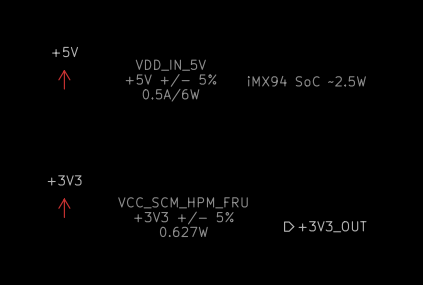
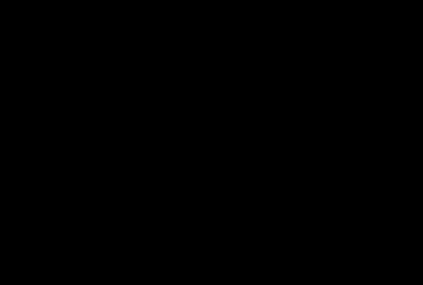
text: VDD_IN_5V (170, 65) -> none
power symbol: +5V (64, 79) -> none
text: +5V +/- 5% (171, 80) -> none
text: iMX94 SoC ~2.5W (306, 81) -> none
text: 0.5A/6W (171, 95) -> none
text: VCC_SCM_HPM_FRU (183, 202) -> none
power symbol: +3V3 (64, 208) -> none
text: +3V3 +/- 5% (183, 218) -> none
hierarchical label: +3V3_OUT (332, 226) -> none
text: 0.627W (183, 231) -> none

